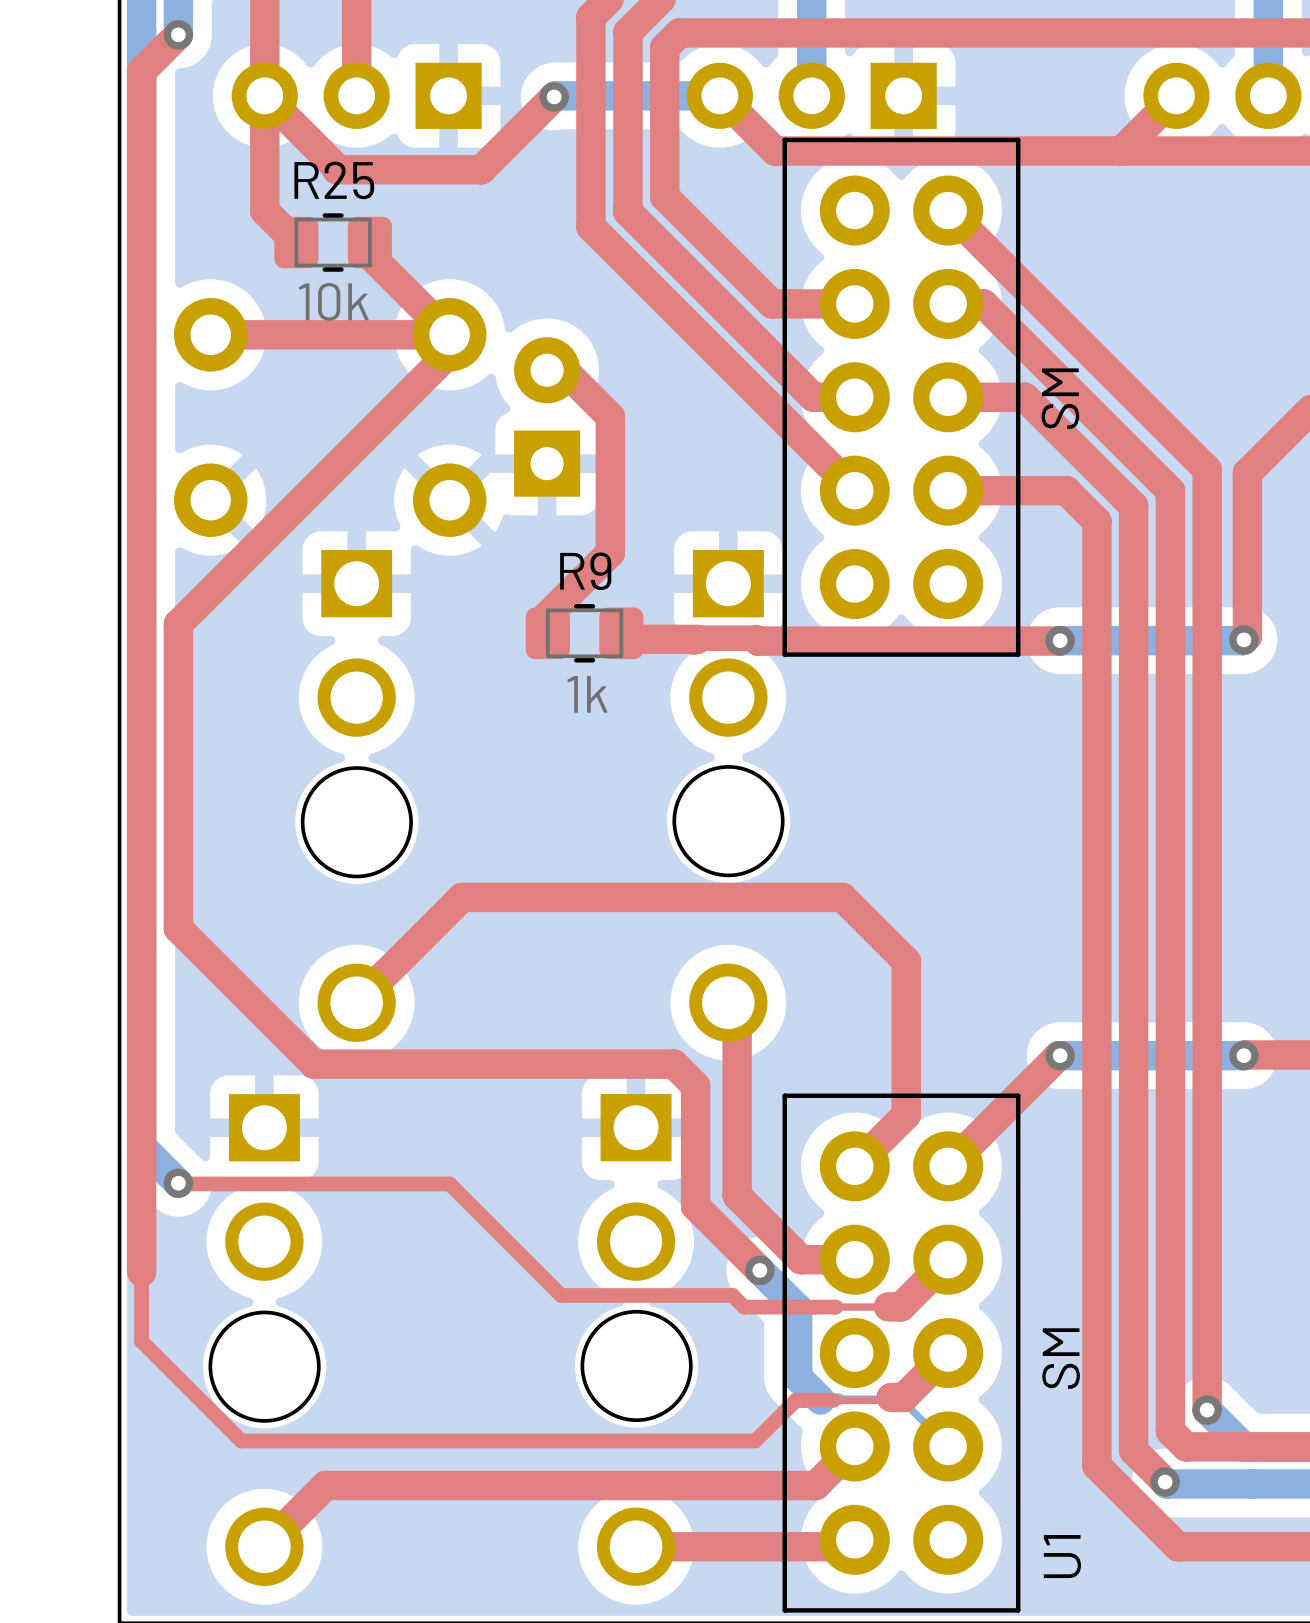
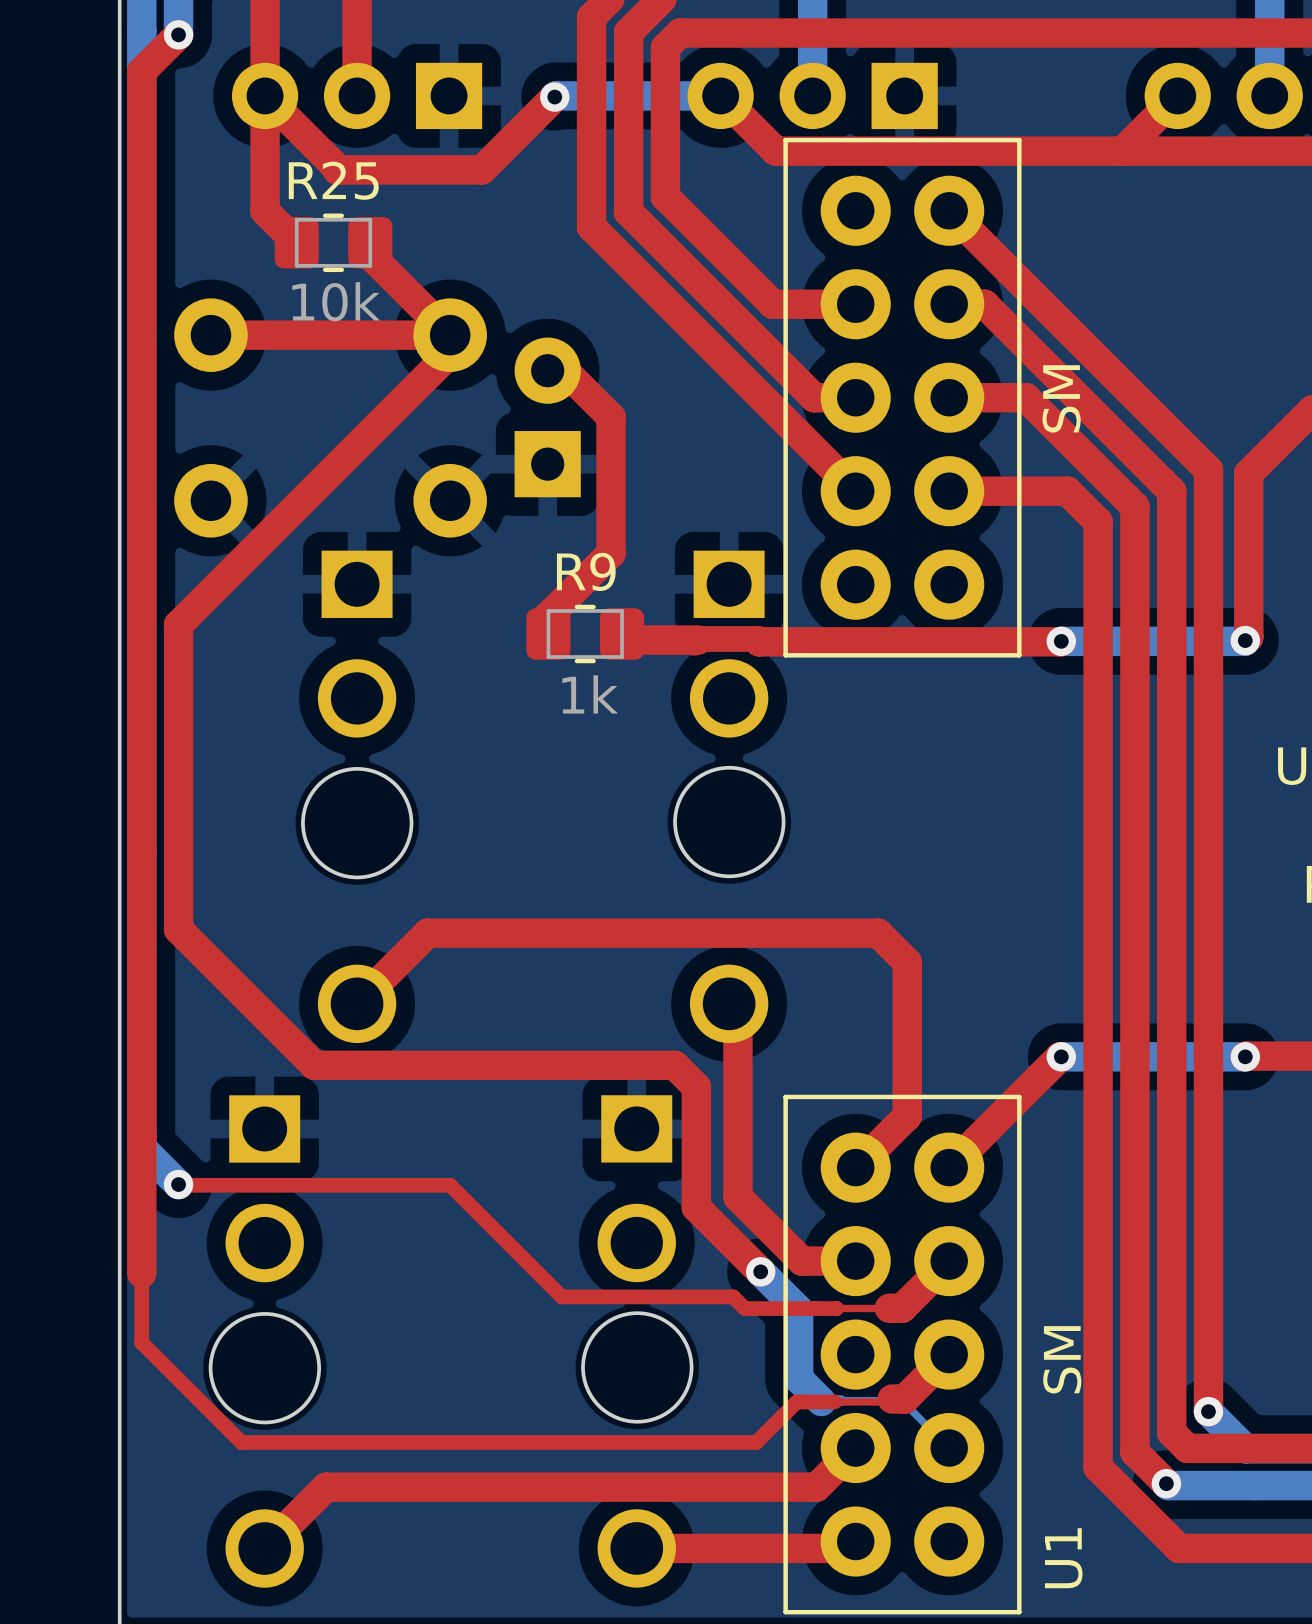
top track: (427, 932) (461, 897) (842, 897) (877, 932) -> (427, 933) (878, 933)

